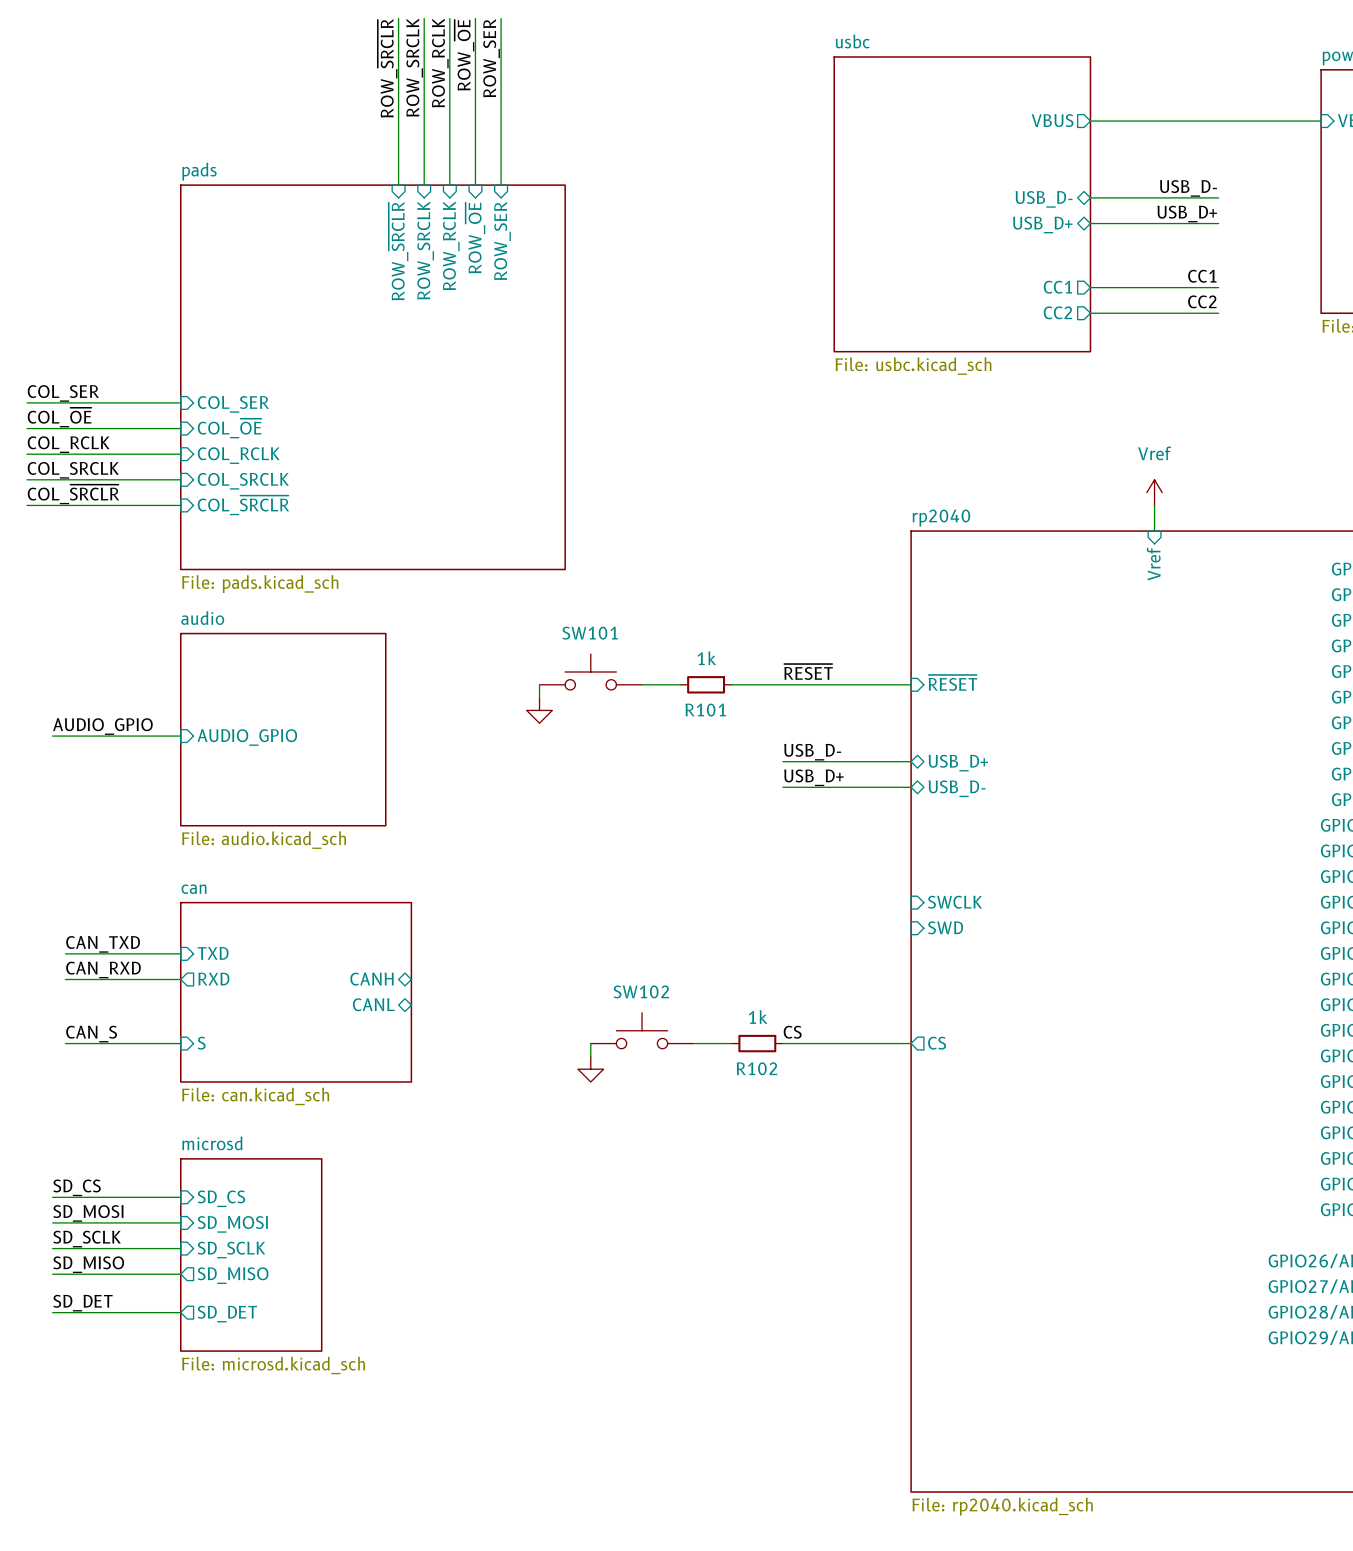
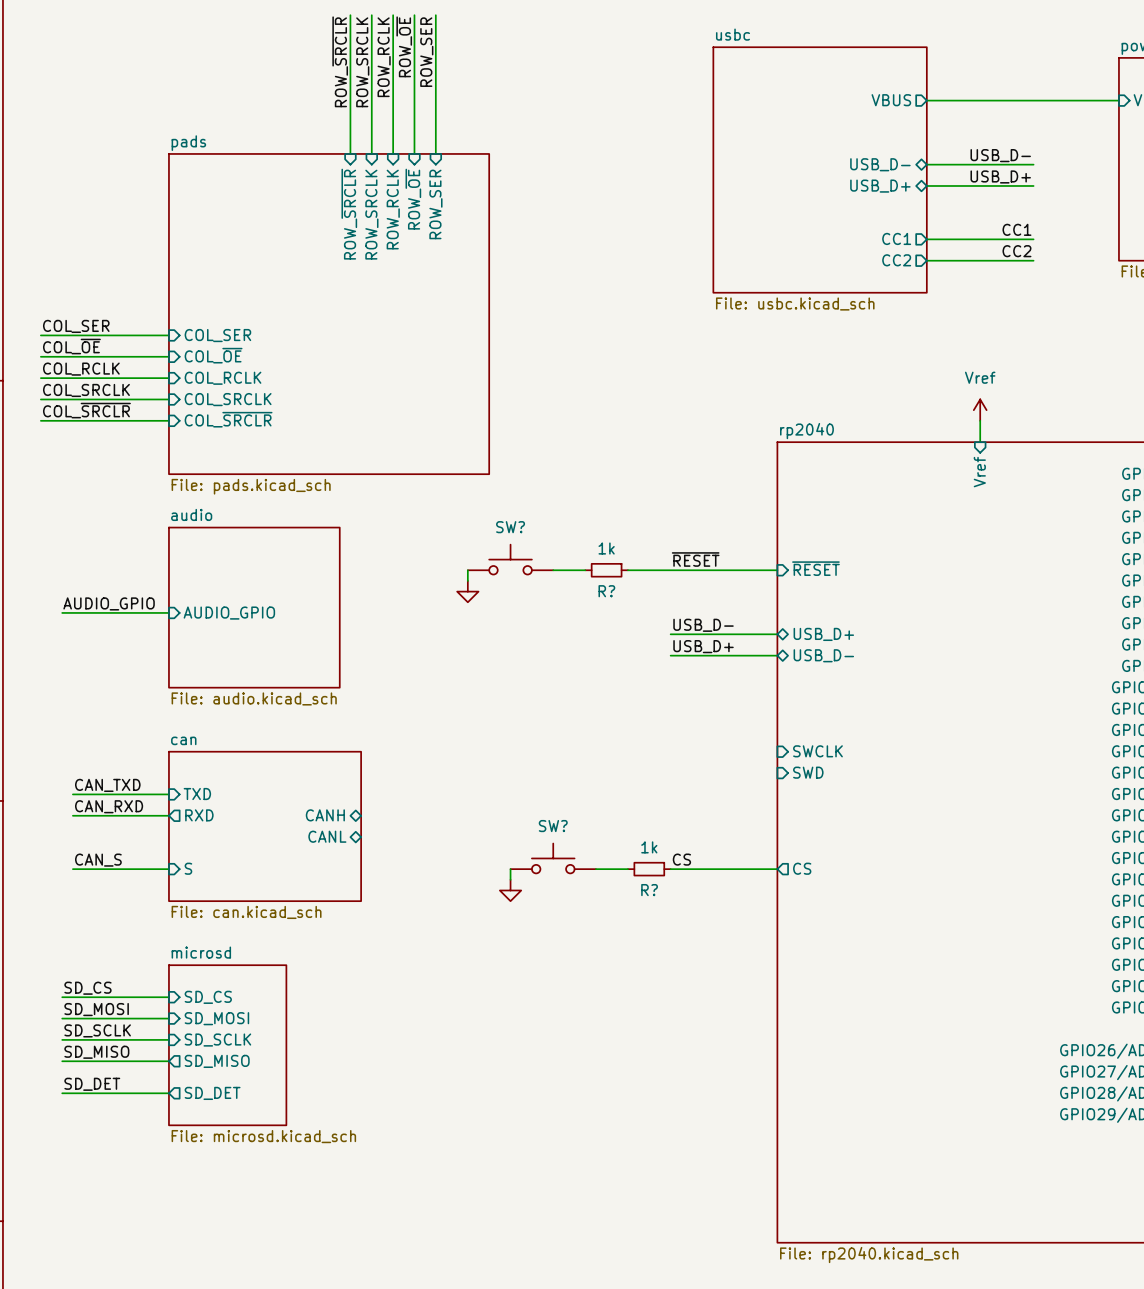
SW101 name: SW101 (590, 633) -> SW? (510, 527)
R101 name: R101 (705, 710) -> R? (606, 591)
SW102 name: SW102 (641, 991) -> SW? (553, 826)
R102 name: R102 (756, 1068) -> R? (649, 890)

